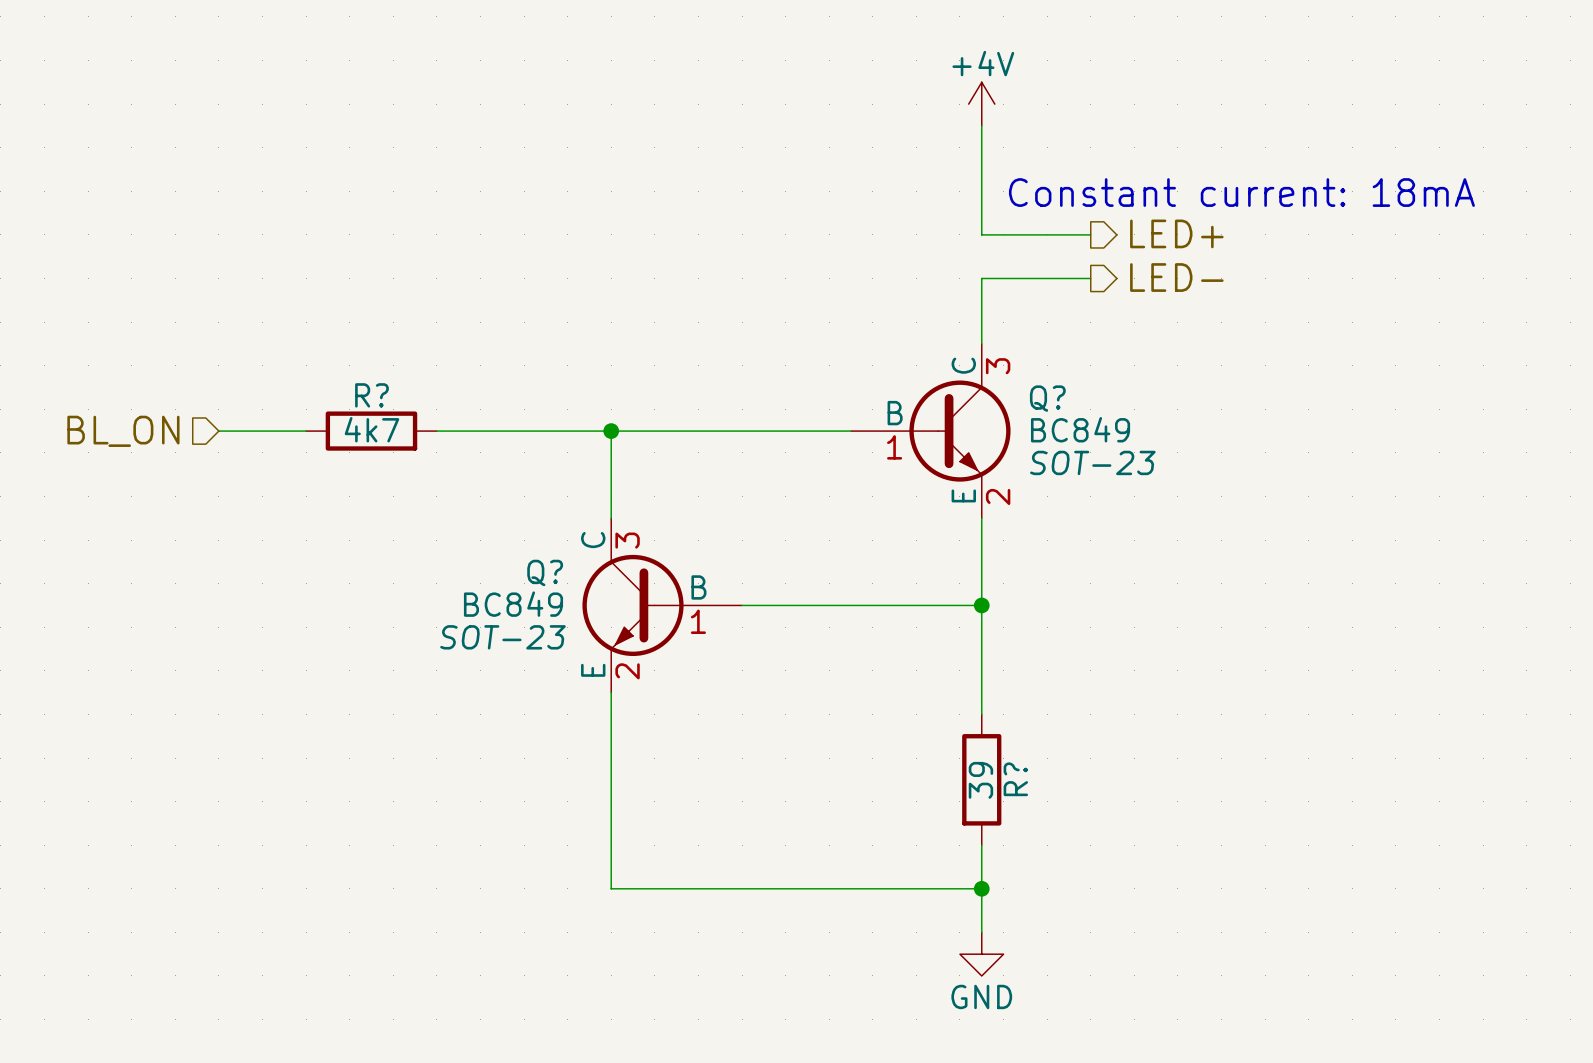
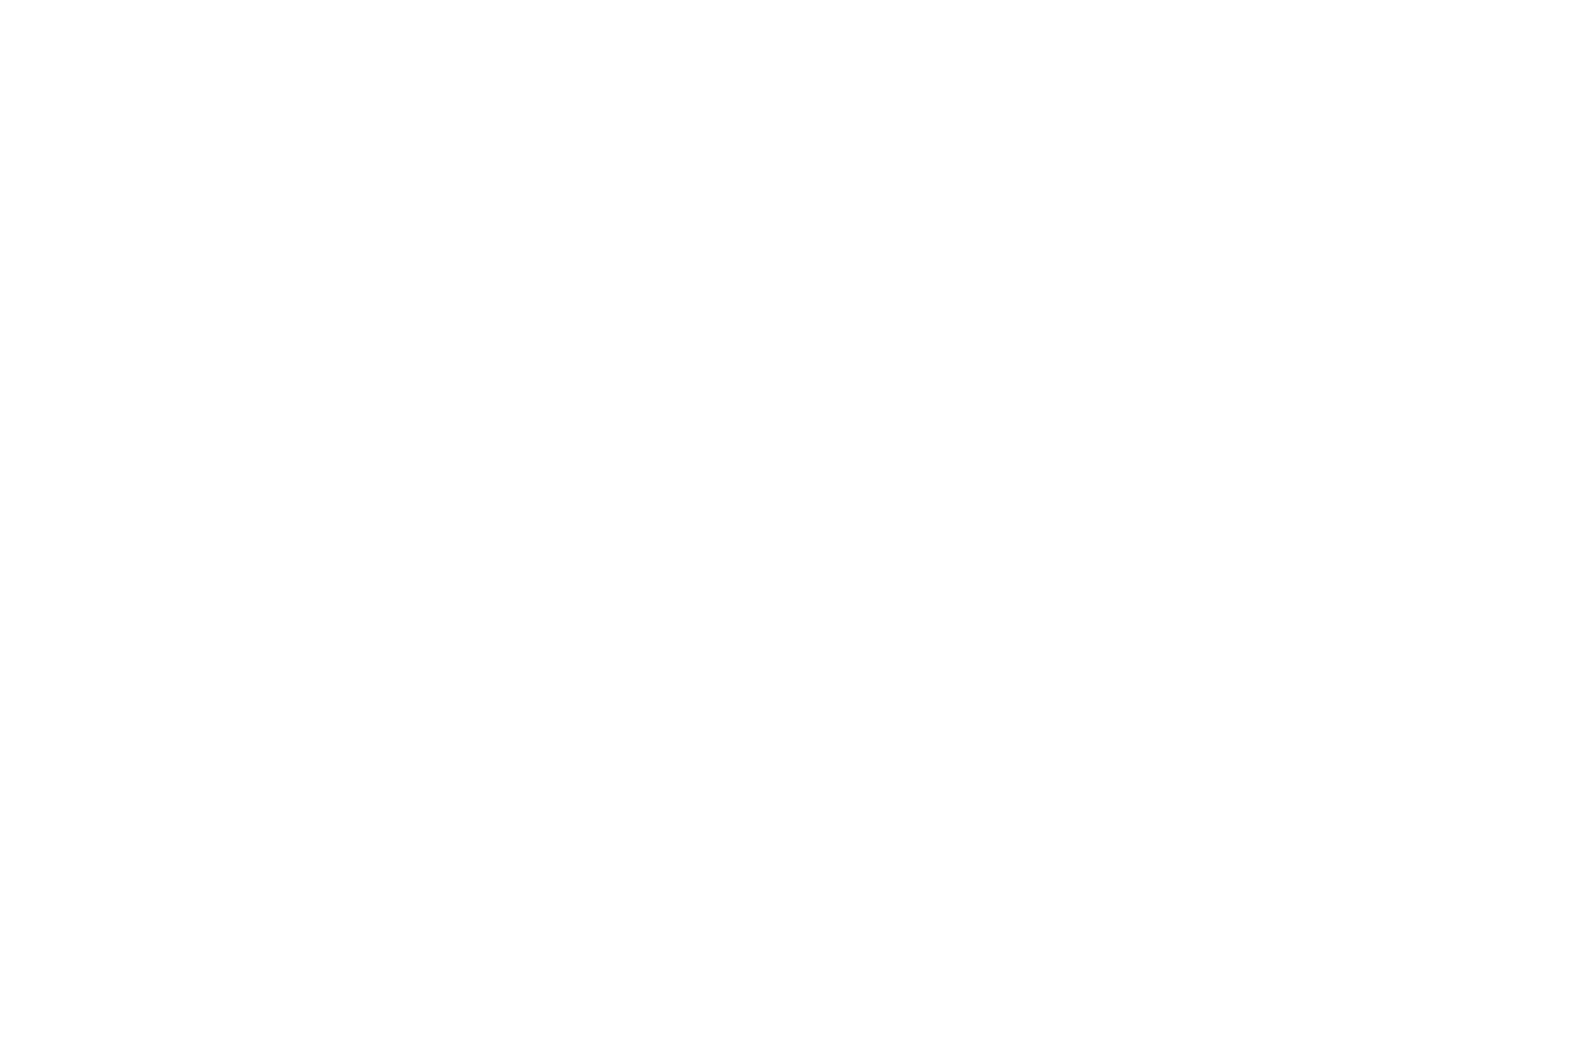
power symbol: +4V (981, 104) -> none
wire: (981, 125) (981, 234) (1090, 234) -> none
text: Constant current: 18mA (1241, 192) -> none
hierarchical label: LED+ (1176, 233) -> none
hierarchical label: LED- (1176, 277) -> none
wire: (1090, 278) (981, 278) (981, 343) -> none
hierarchical label: BL_ON (123, 431) -> none
wire: (218, 431) (306, 431) -> none
R?: 4k7 (371, 431) -> none
wire: (436, 431) (850, 431) -> none
wire: (611, 431) (611, 518) -> none
junction: (611, 431) -> none
Q?: BC849 (930, 431) -> none
wire: (981, 518) (981, 714) -> none
Q?: BC849 (662, 605) -> none
wire: (742, 605) (981, 605) -> none
junction: (981, 605) -> none
wire: (611, 692) (611, 888) (981, 888) -> none
R?: 39 (981, 779) -> none
wire: (981, 845) (981, 932) -> none
junction: (981, 888) -> none
power symbol: GND (981, 954) -> none

